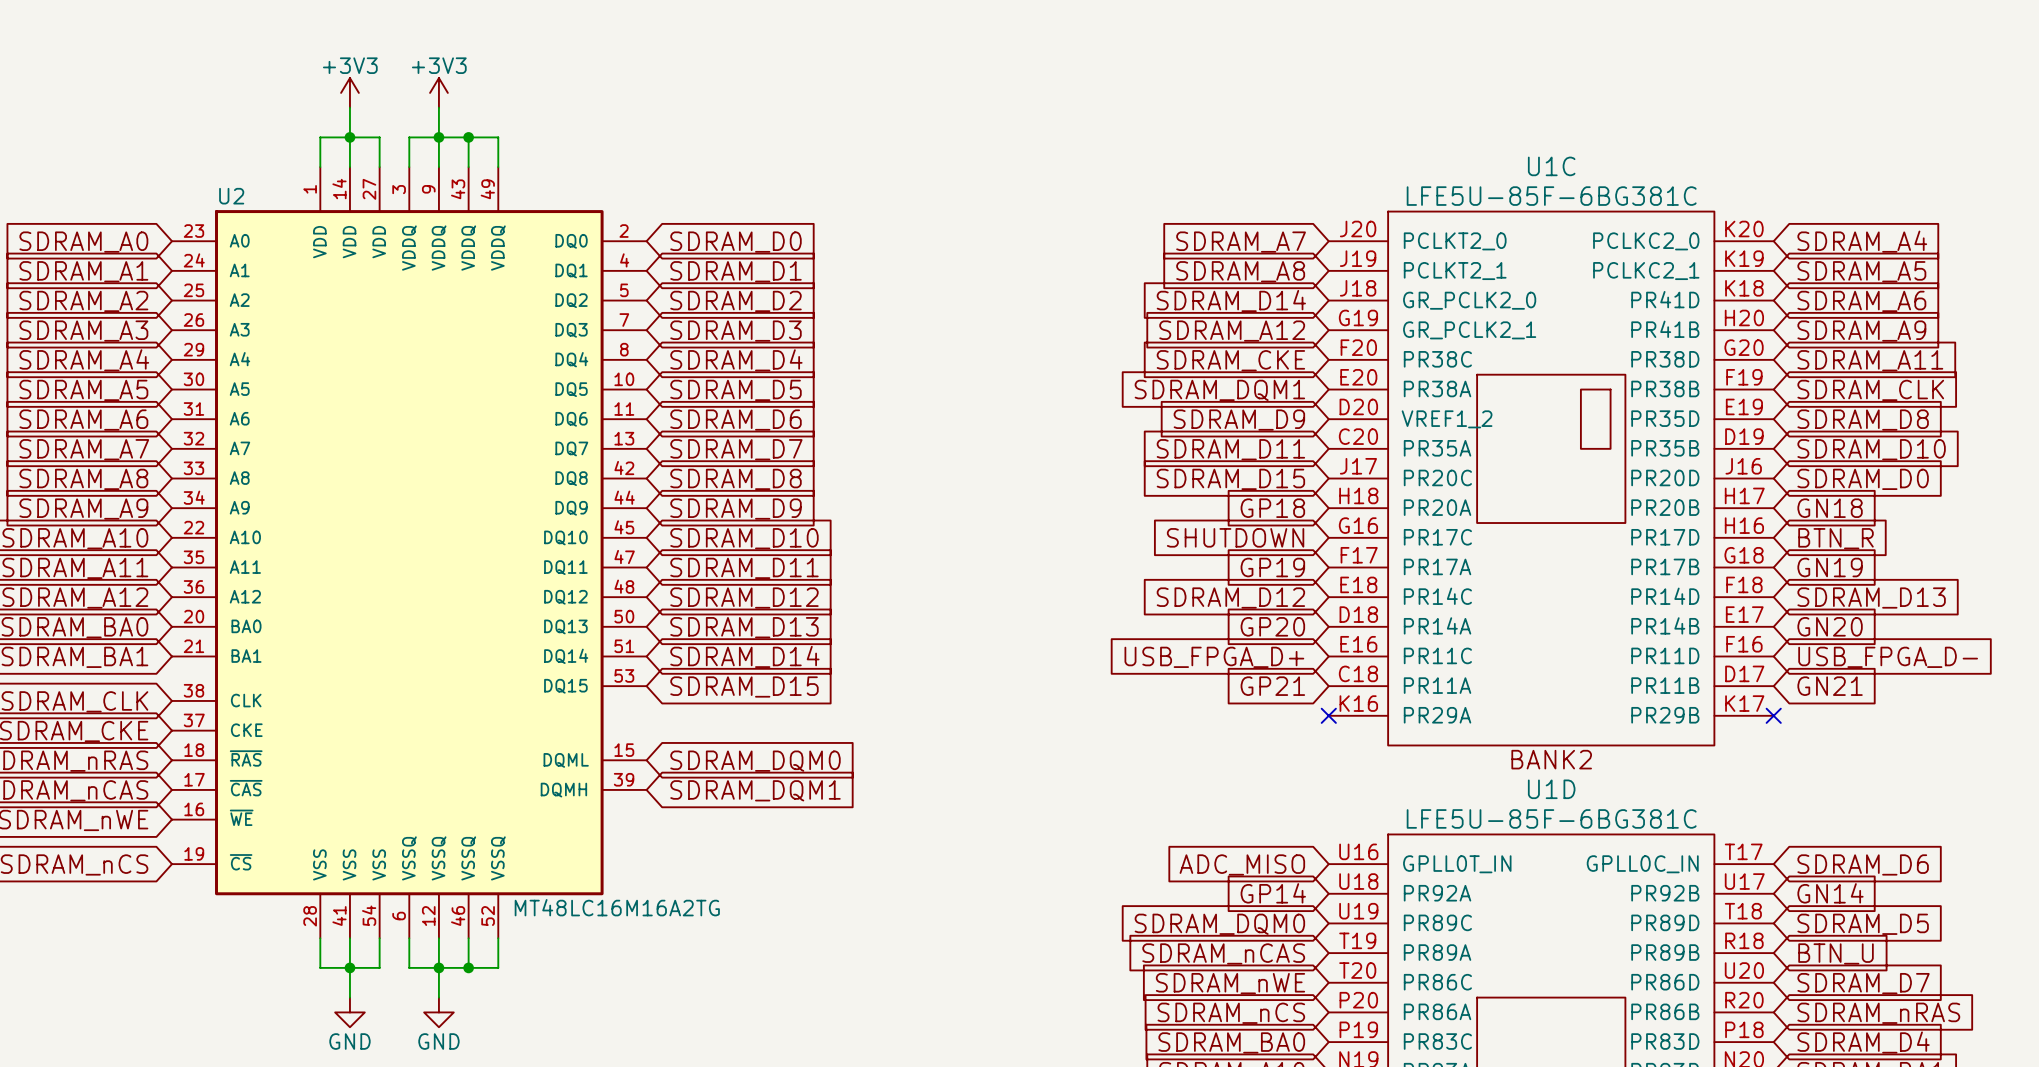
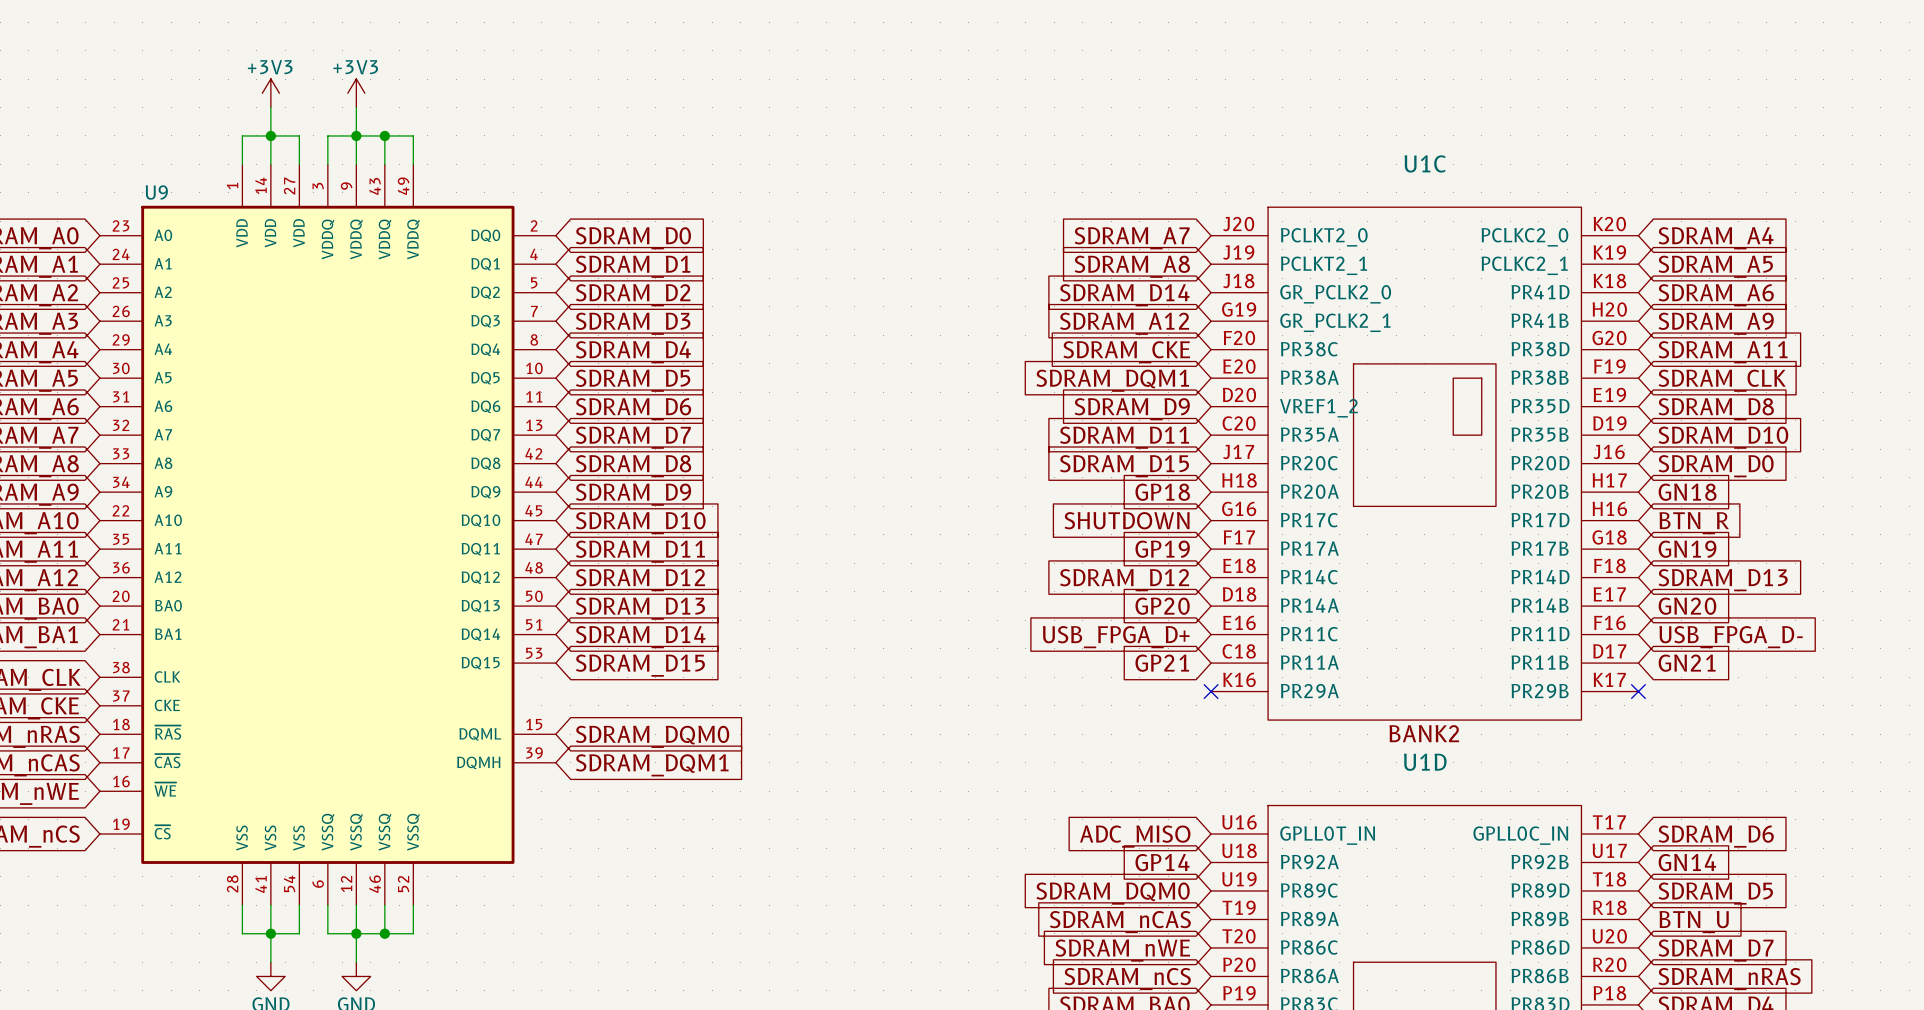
U2 name: U2 (231, 196) -> U9 (156, 192)
U1C value: LFE5U-85F-6BG381C (1551, 196) -> none
U1D value: LFE5U-85F-6BG381C (1551, 818) -> none
U2 value: MT48LC16M16A2TG (617, 907) -> none

